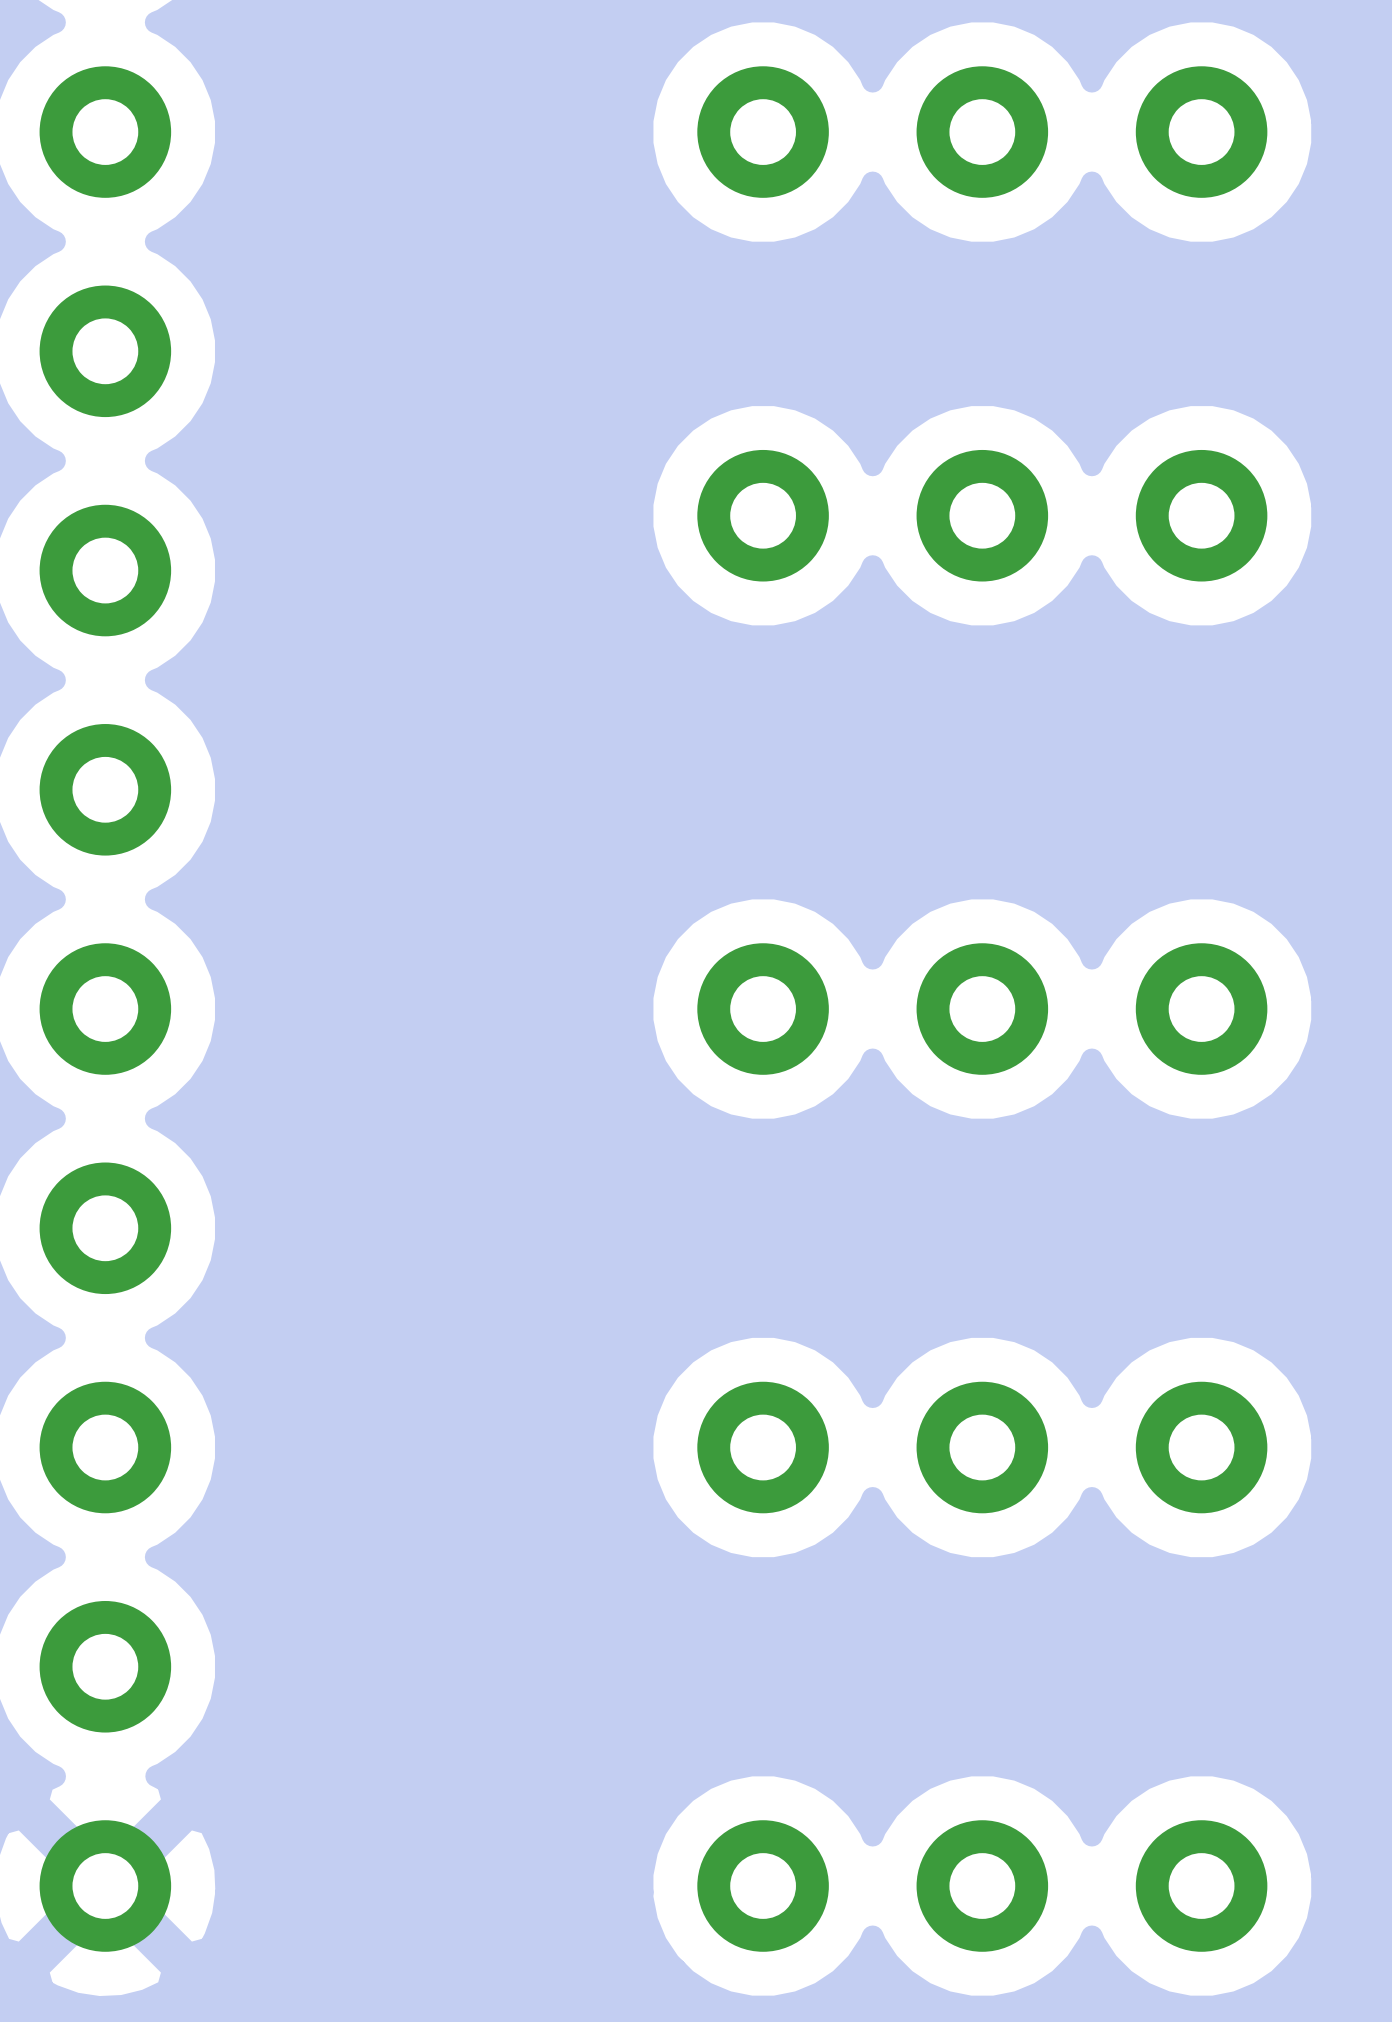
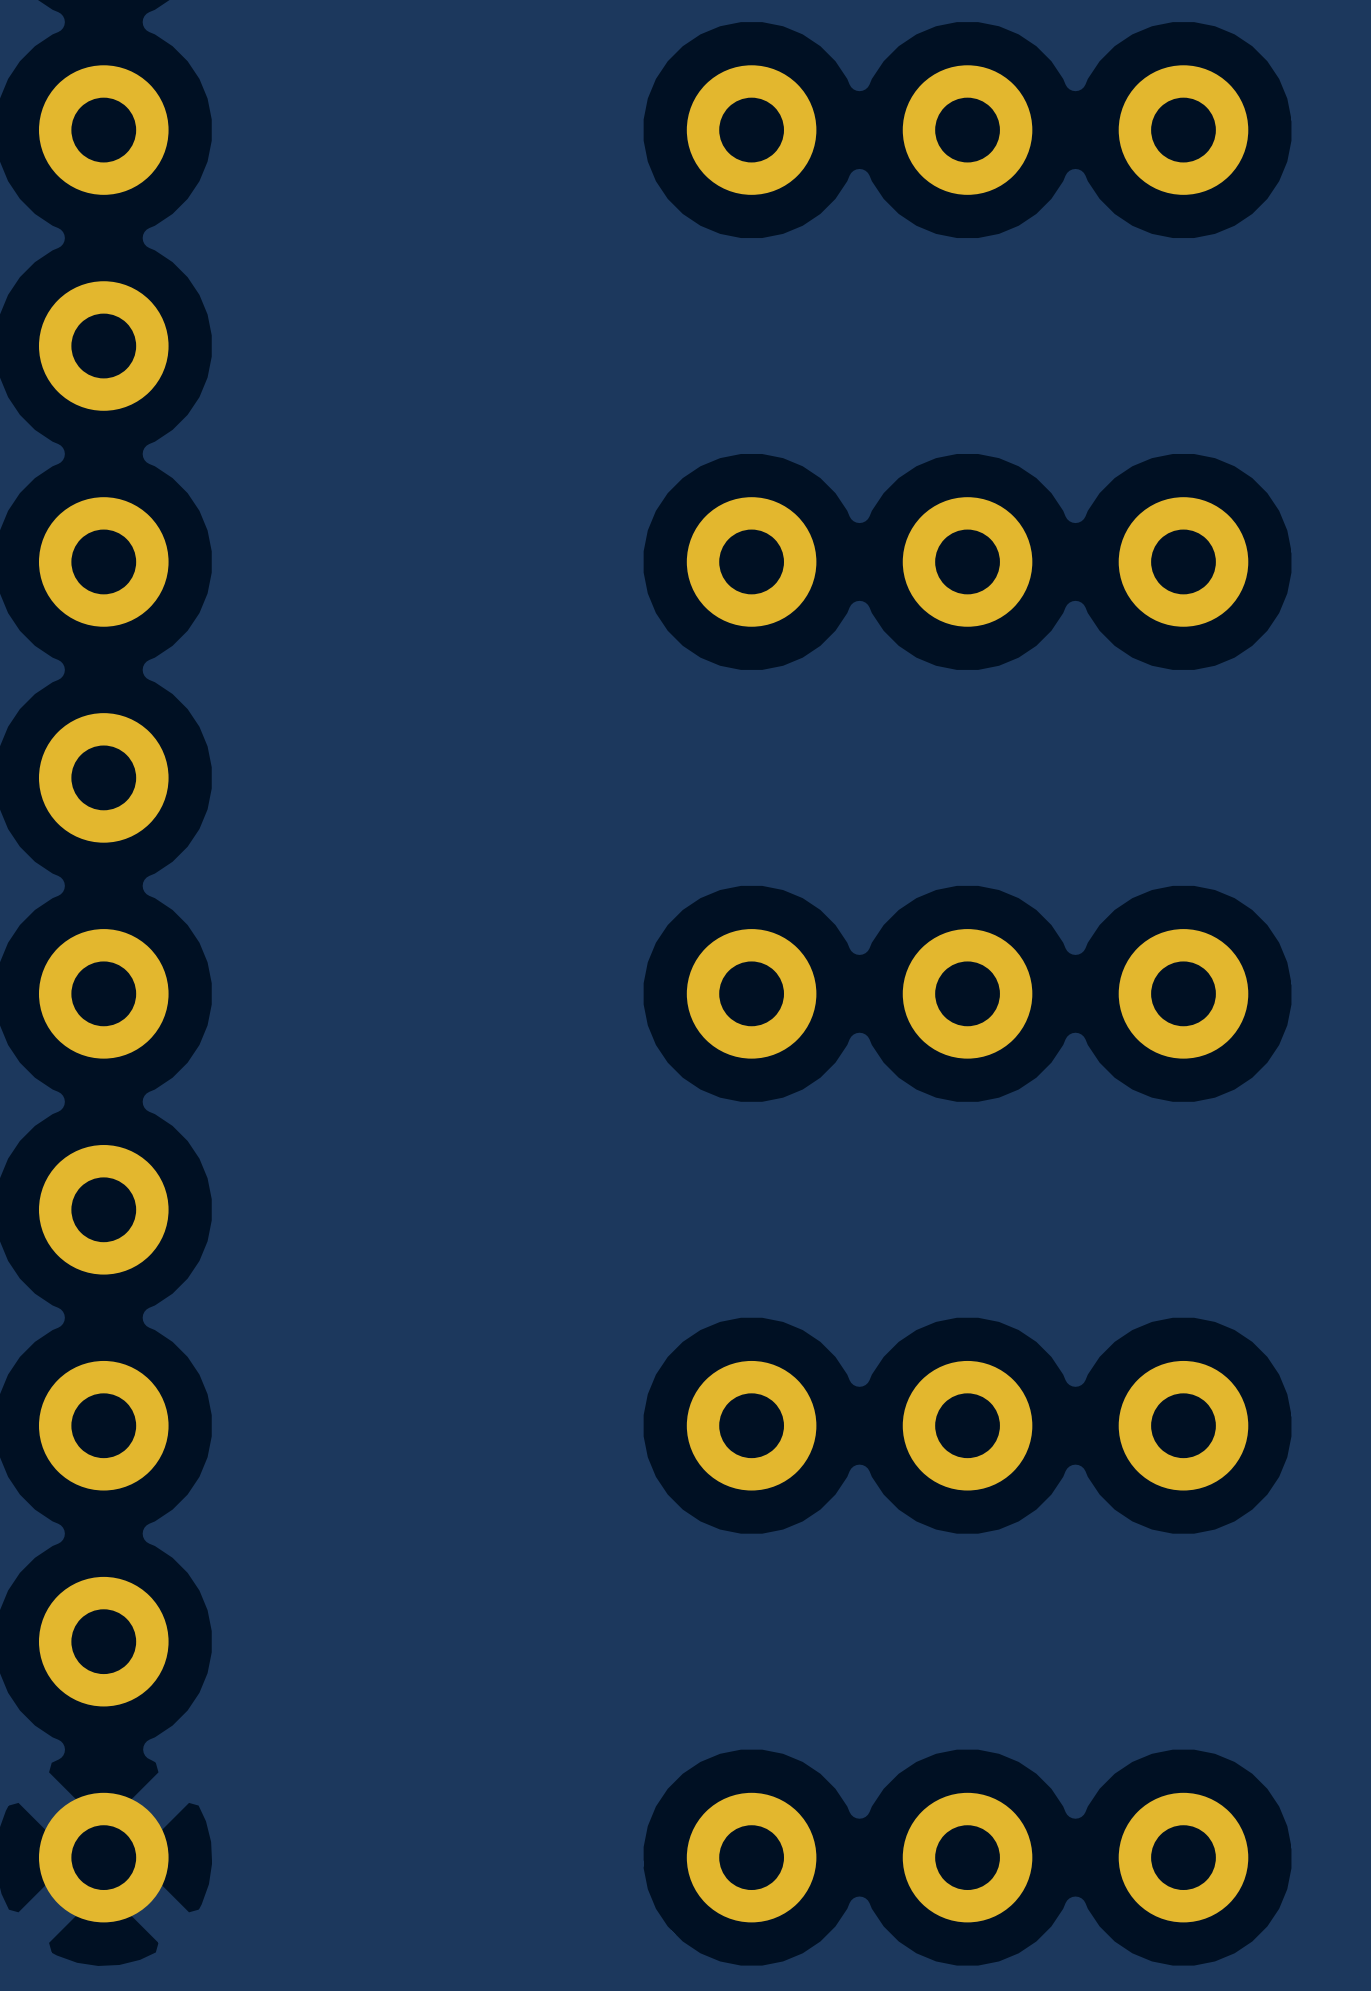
part position: (982, 515) -> (967, 561)

